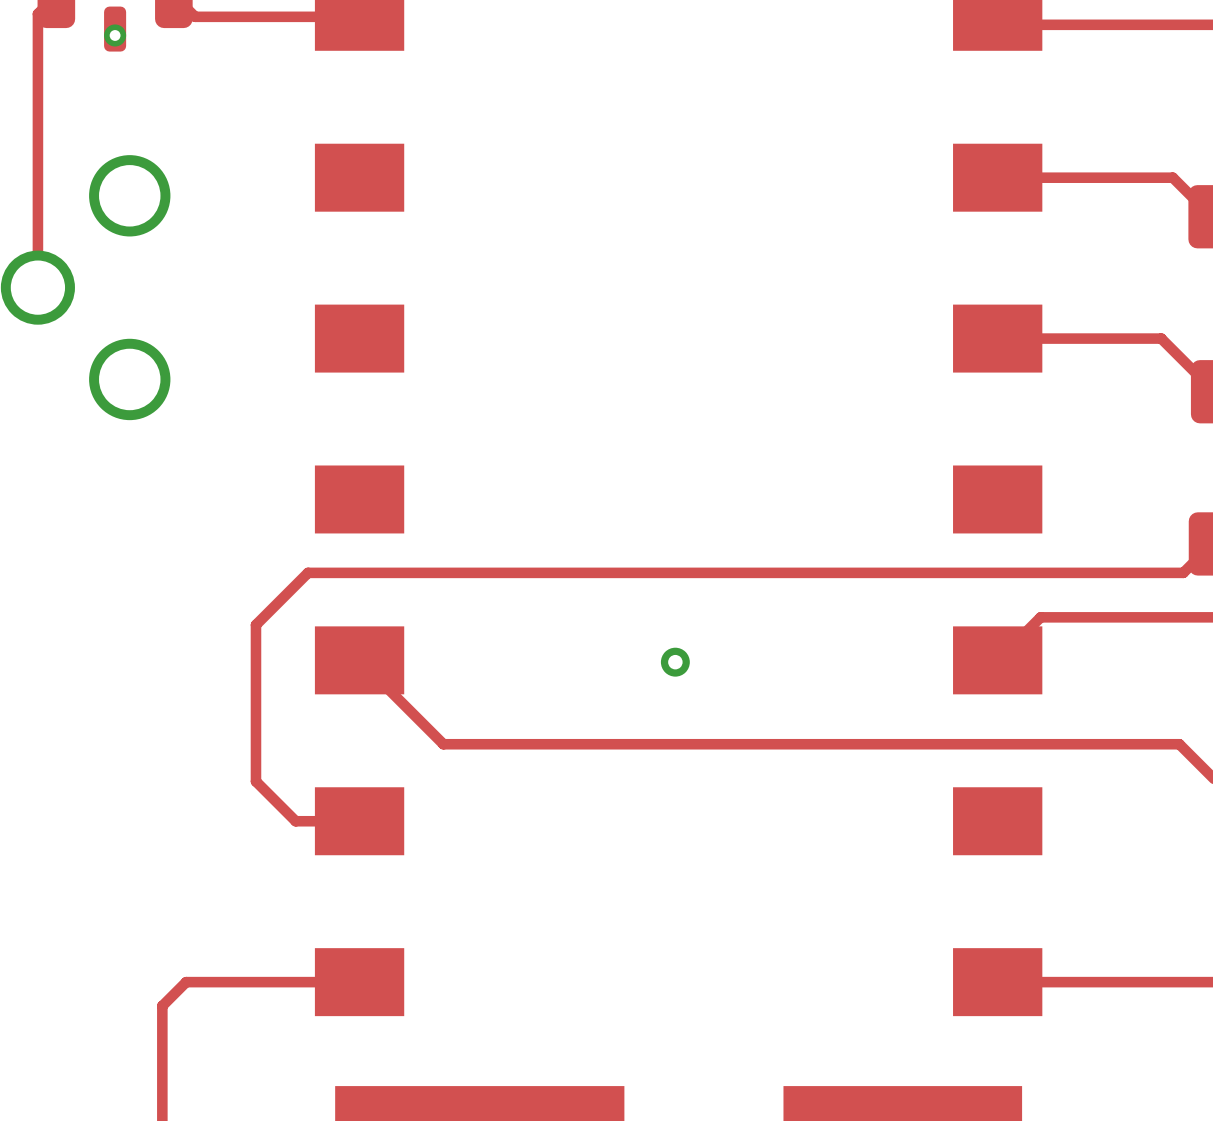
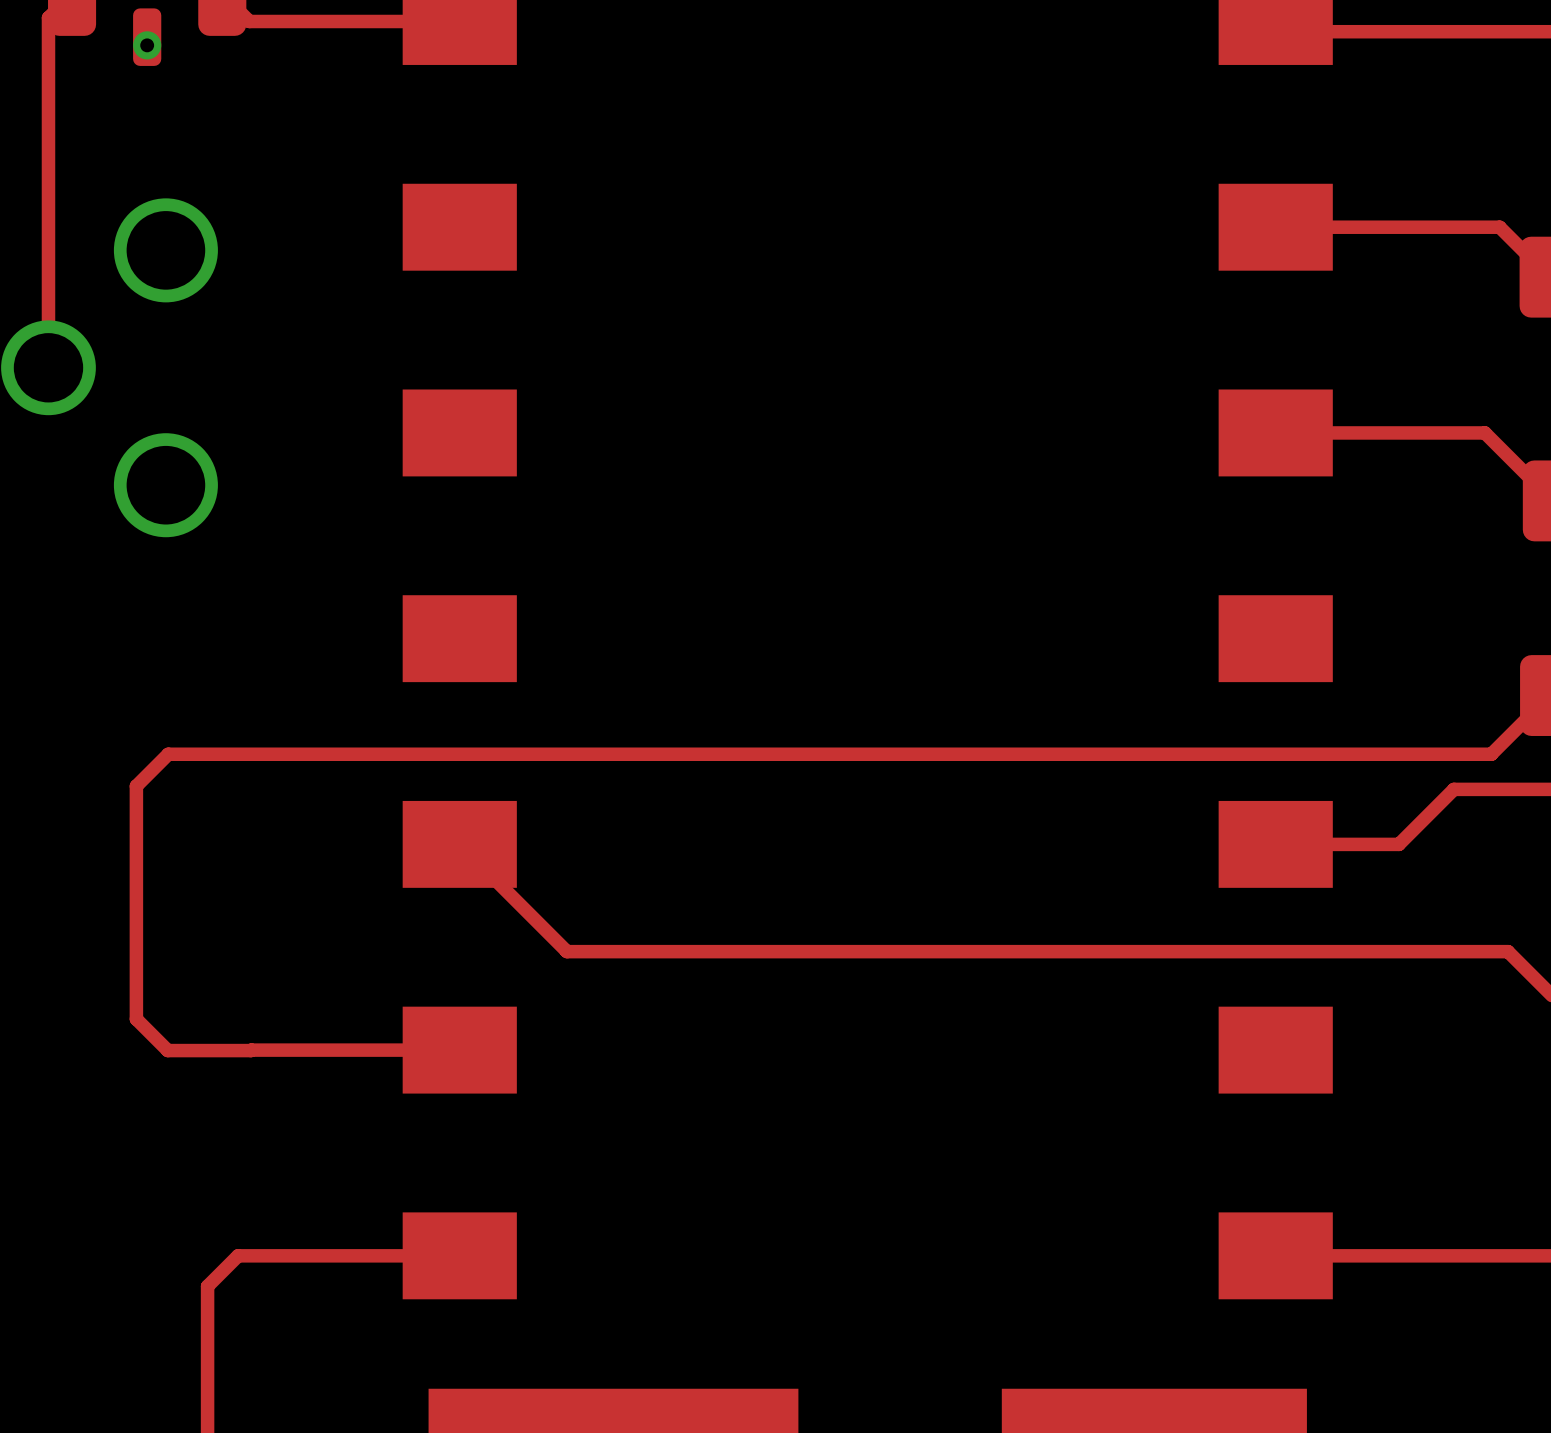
top track: (1183, 572) (308, 572) (255, 624) (255, 781) (295, 821) -> (1513, 732) (1491, 754) (168, 754) (136, 786) (136, 1019) (167, 1050) (251, 1050)
top track: (1137, 617) (1040, 617) (997, 660) -> (1453, 789) (1398, 844) (1275, 844)
via: (675, 662) -> none
top track: none -> (378, 1050) (251, 1050)

